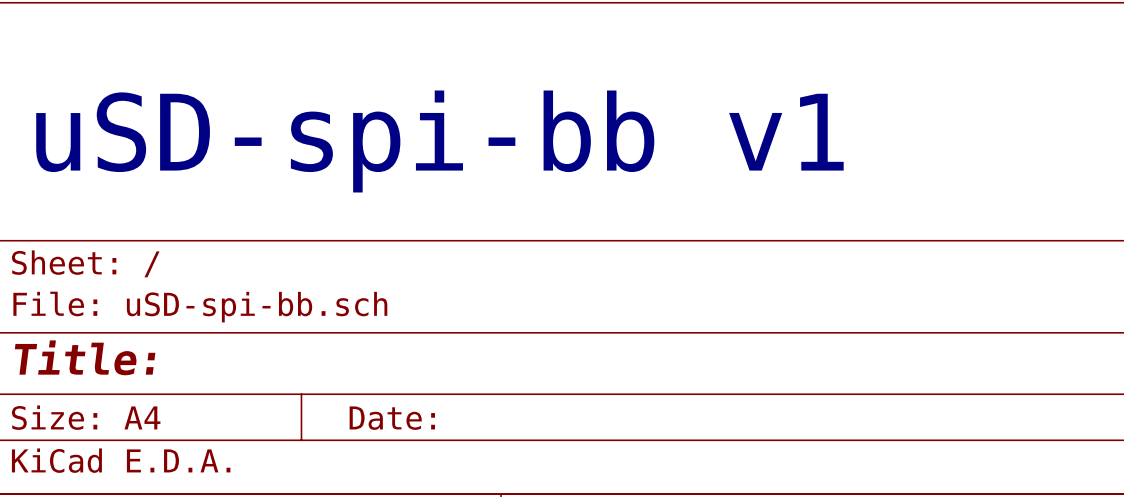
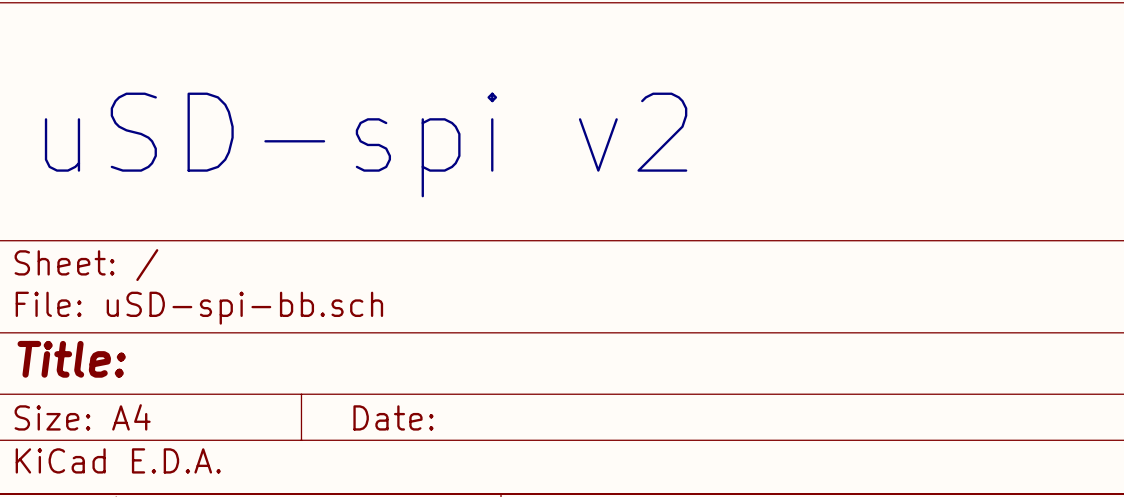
text: uSD-spi-bb v1 (439, 141) -> uSD-spi v2 (366, 144)

